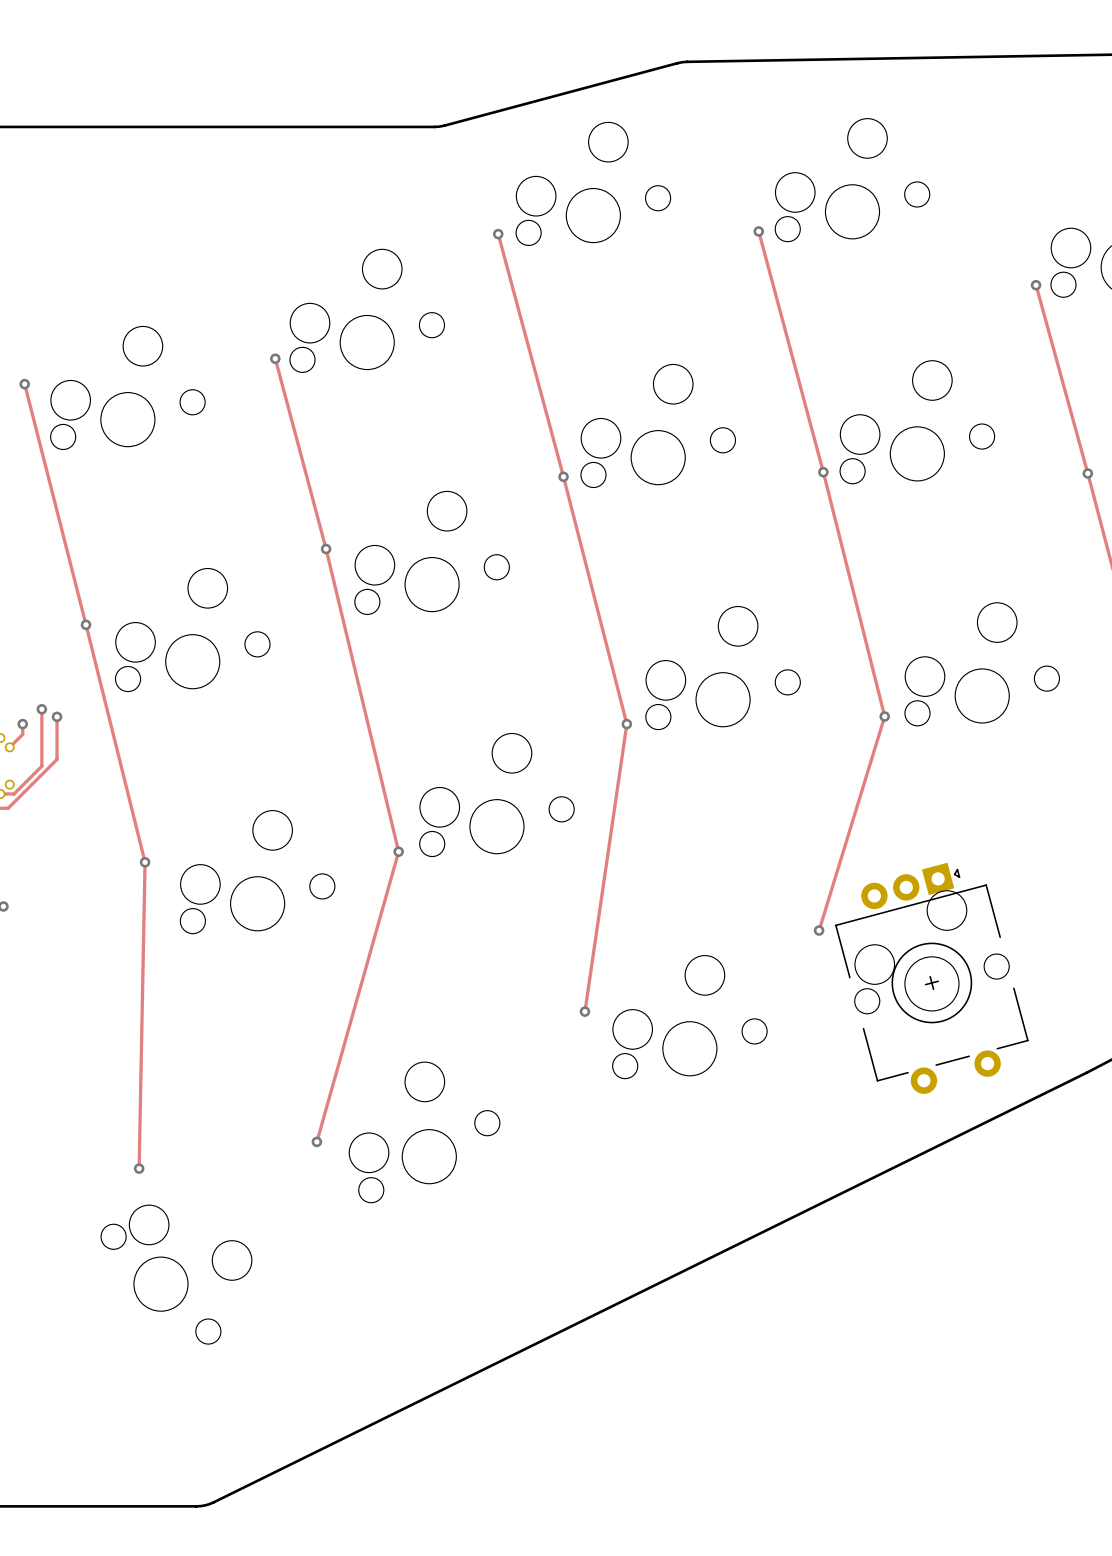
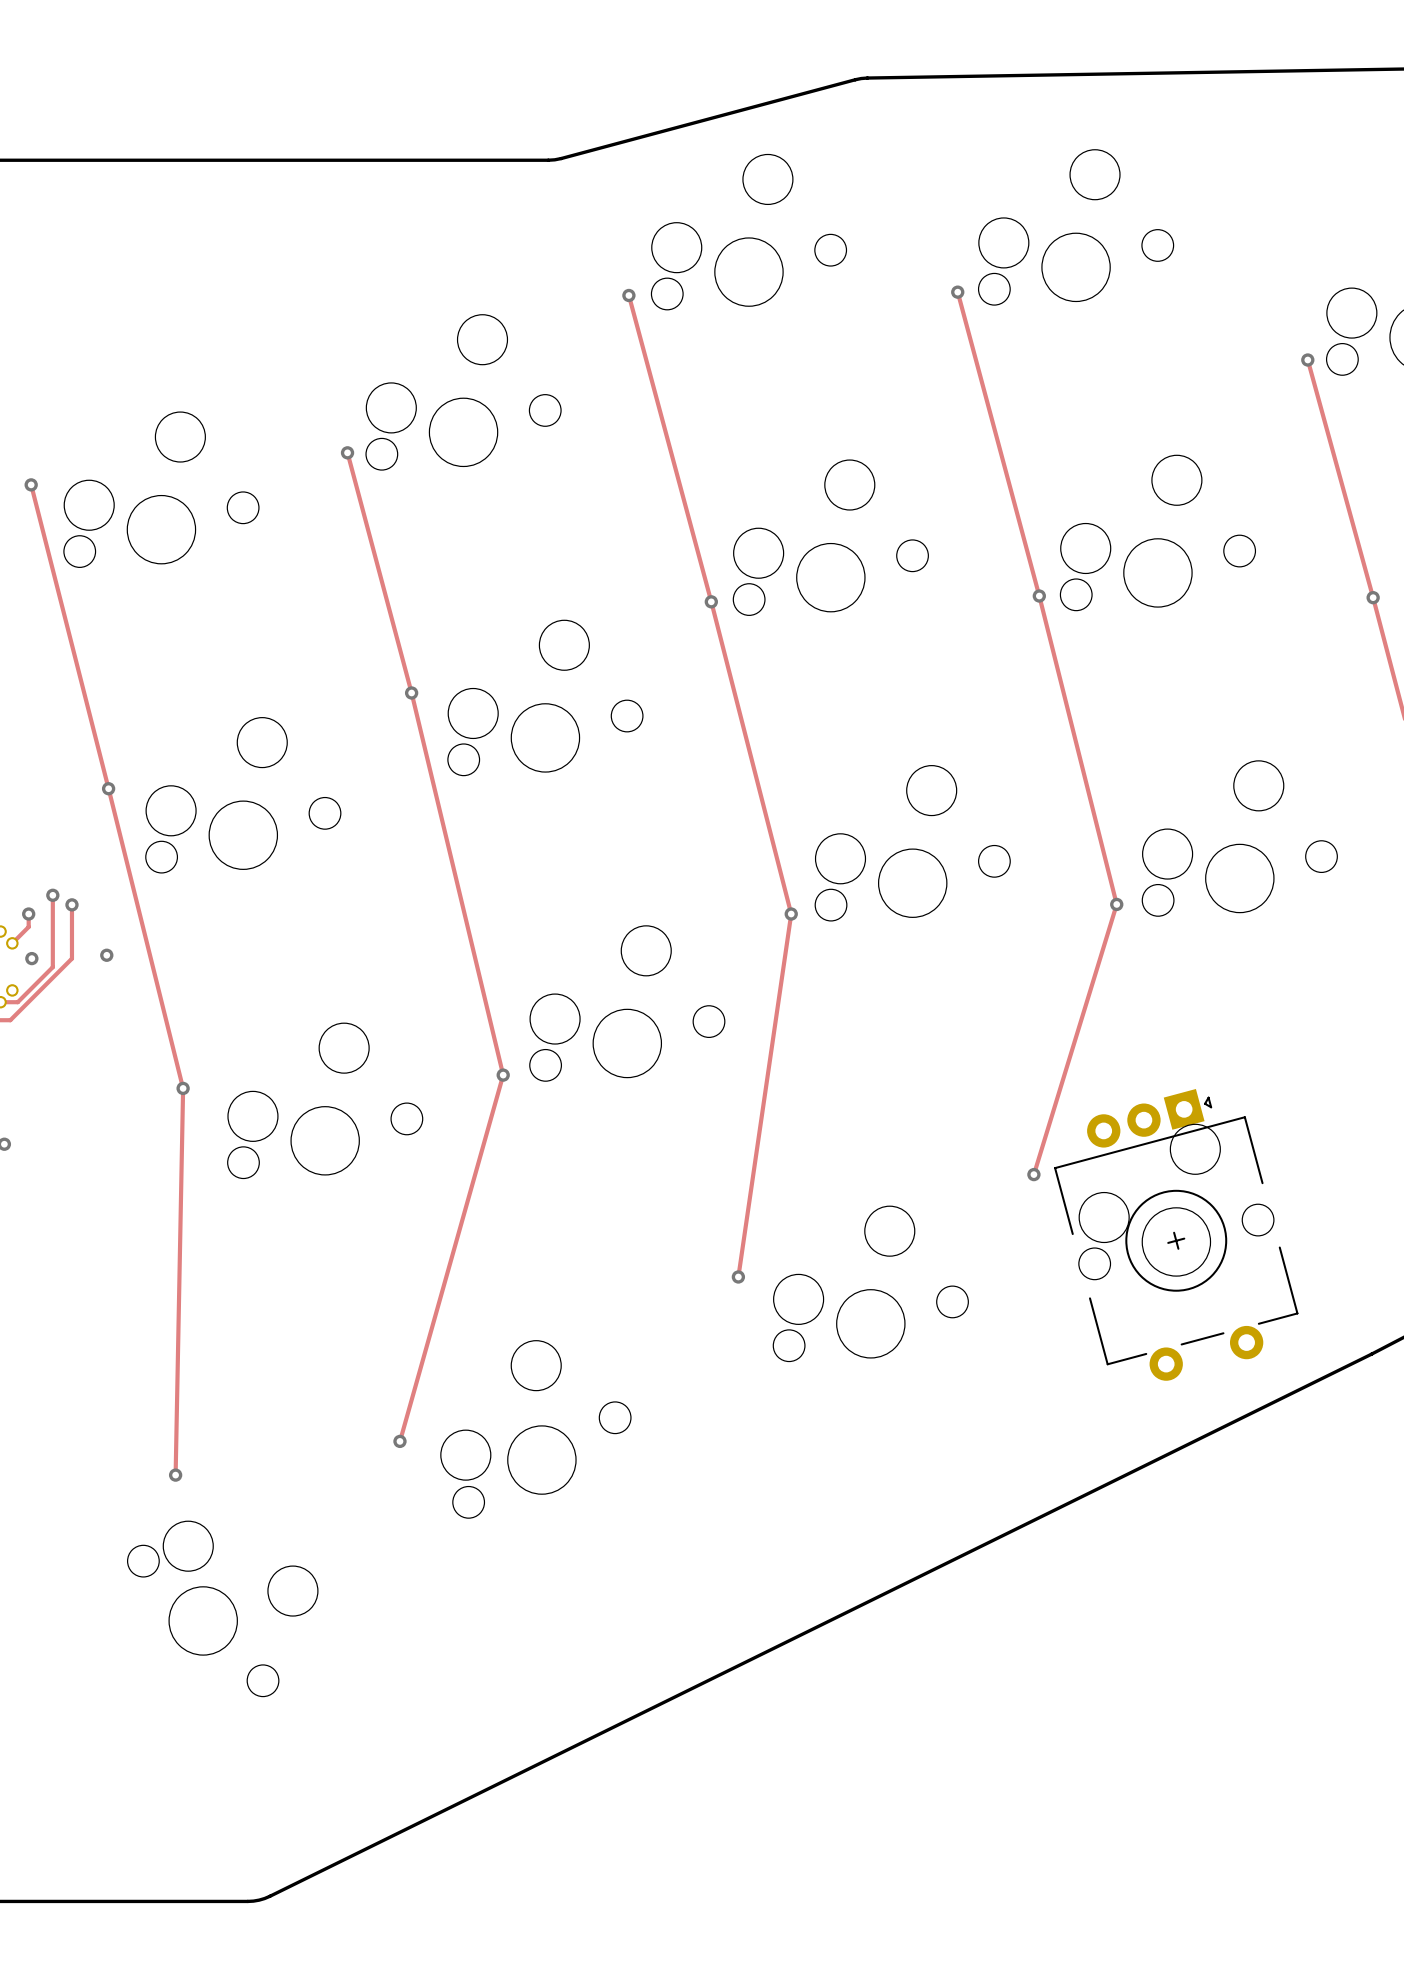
via: none -> (106, 955)
via: none -> (31, 958)

